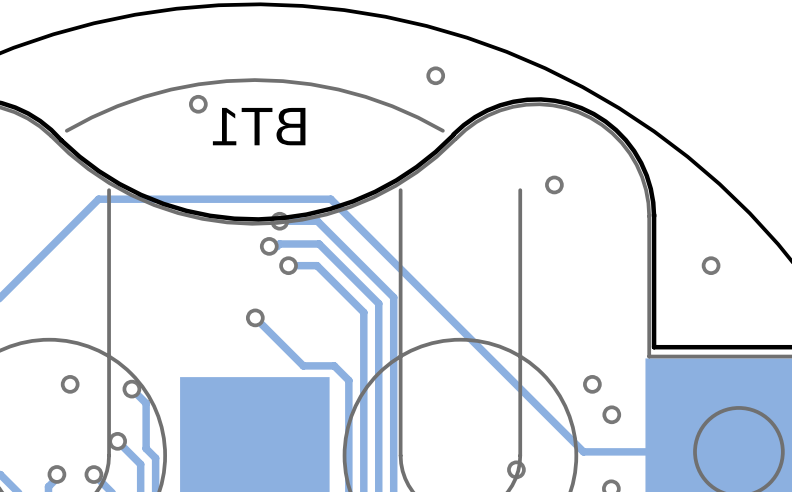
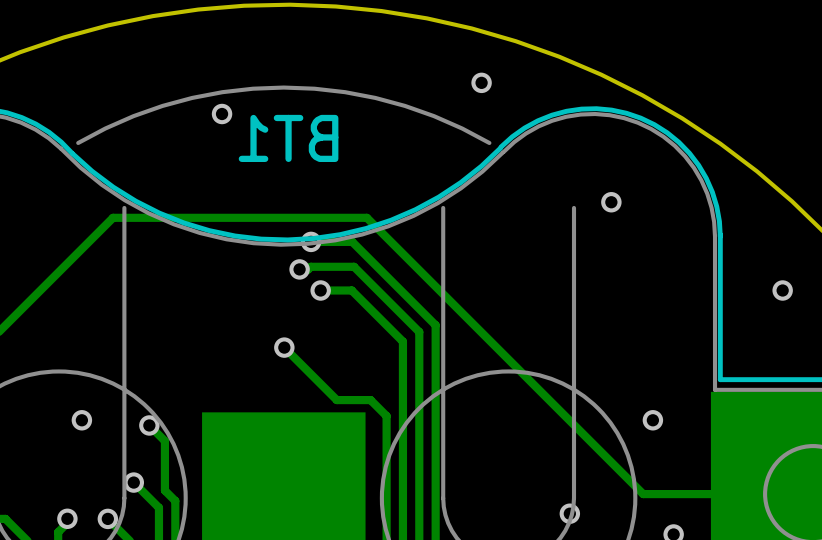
via: (611, 414) -> none

